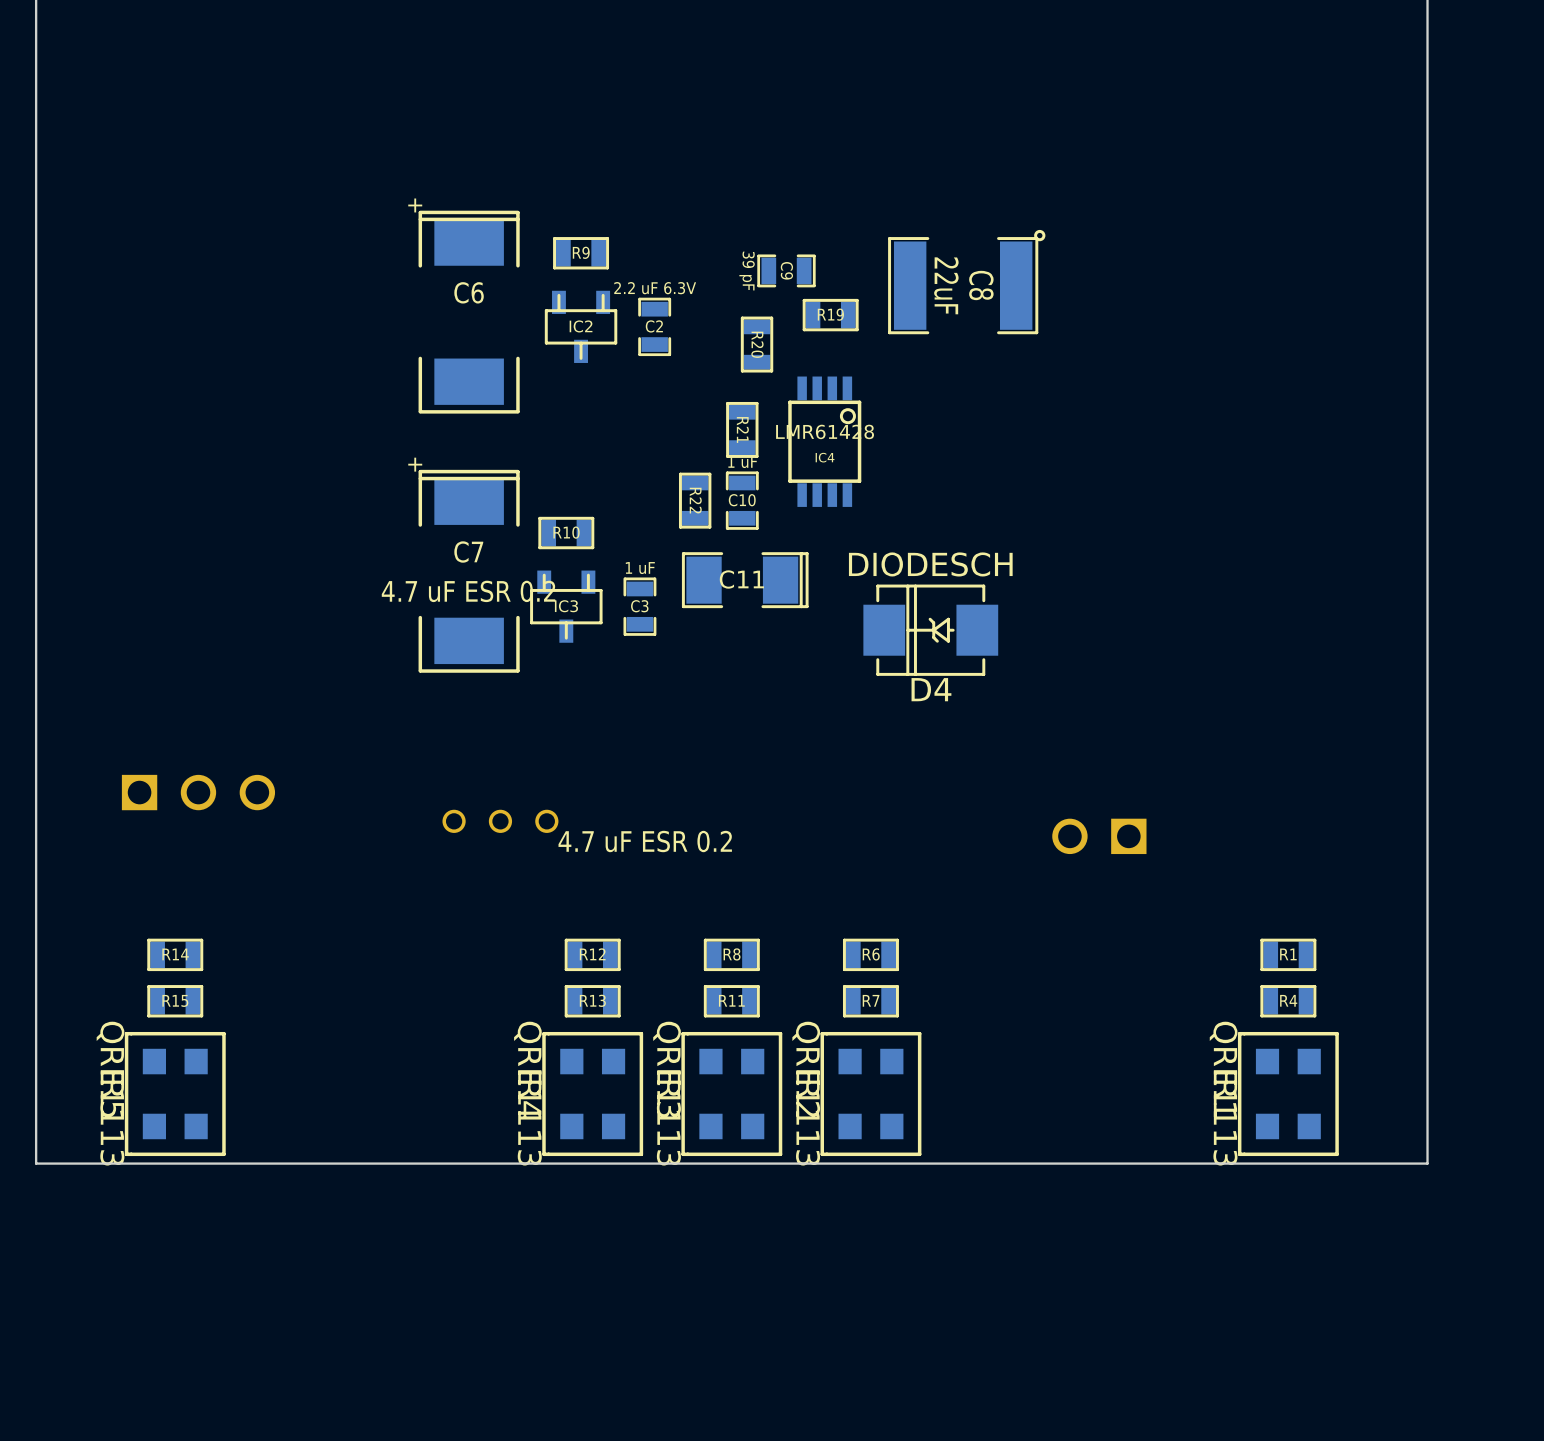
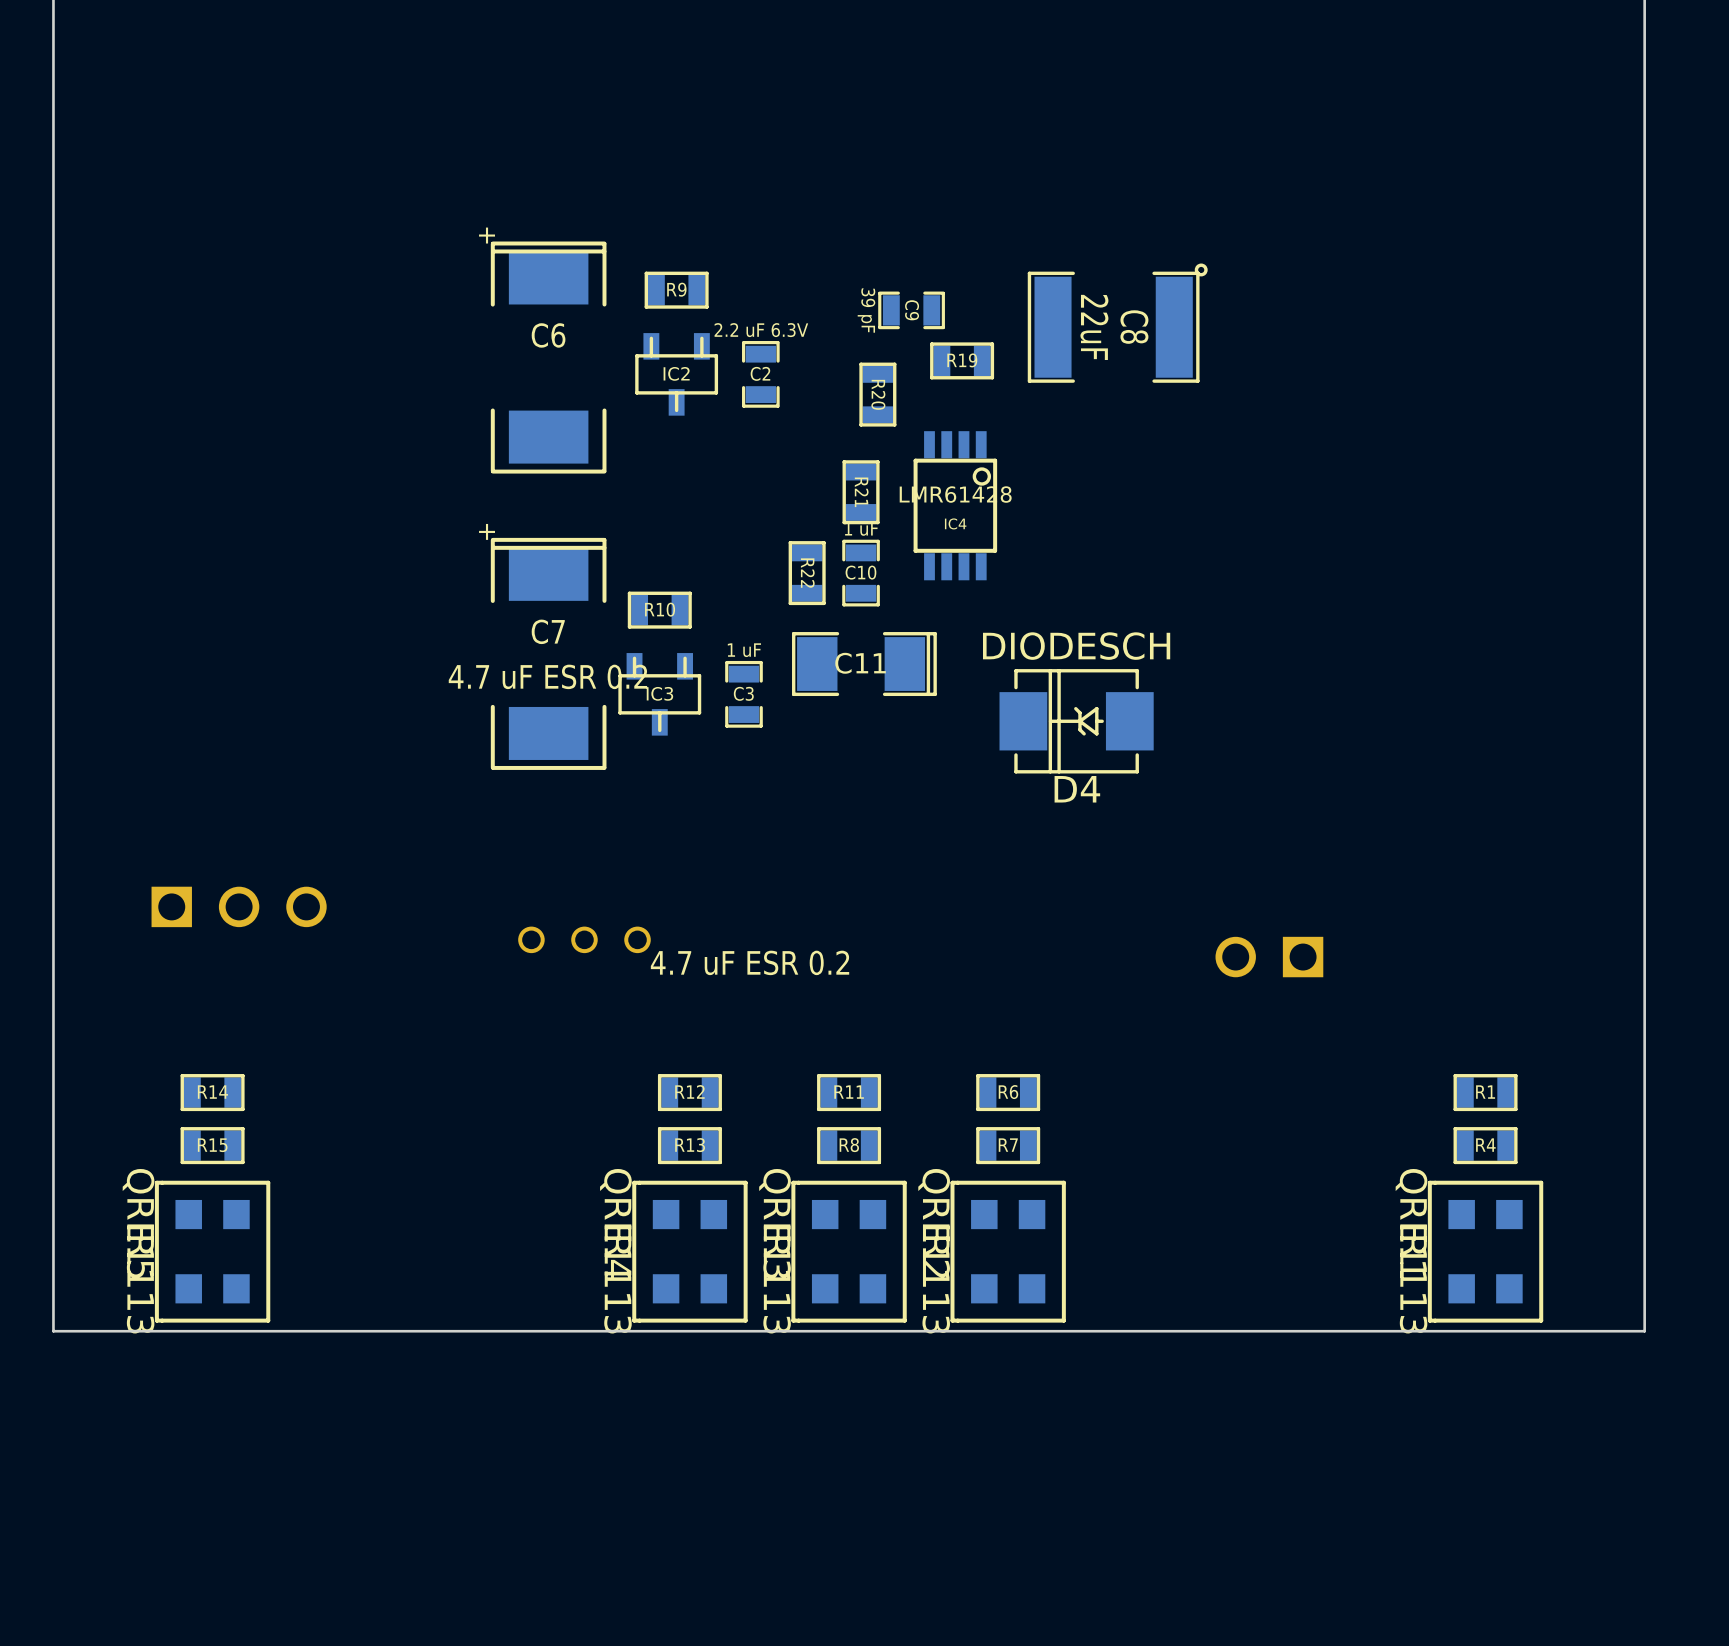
R8 name: R8 (732, 954) -> R11 (849, 1092)
R11 name: R11 (731, 1000) -> R8 (849, 1145)

